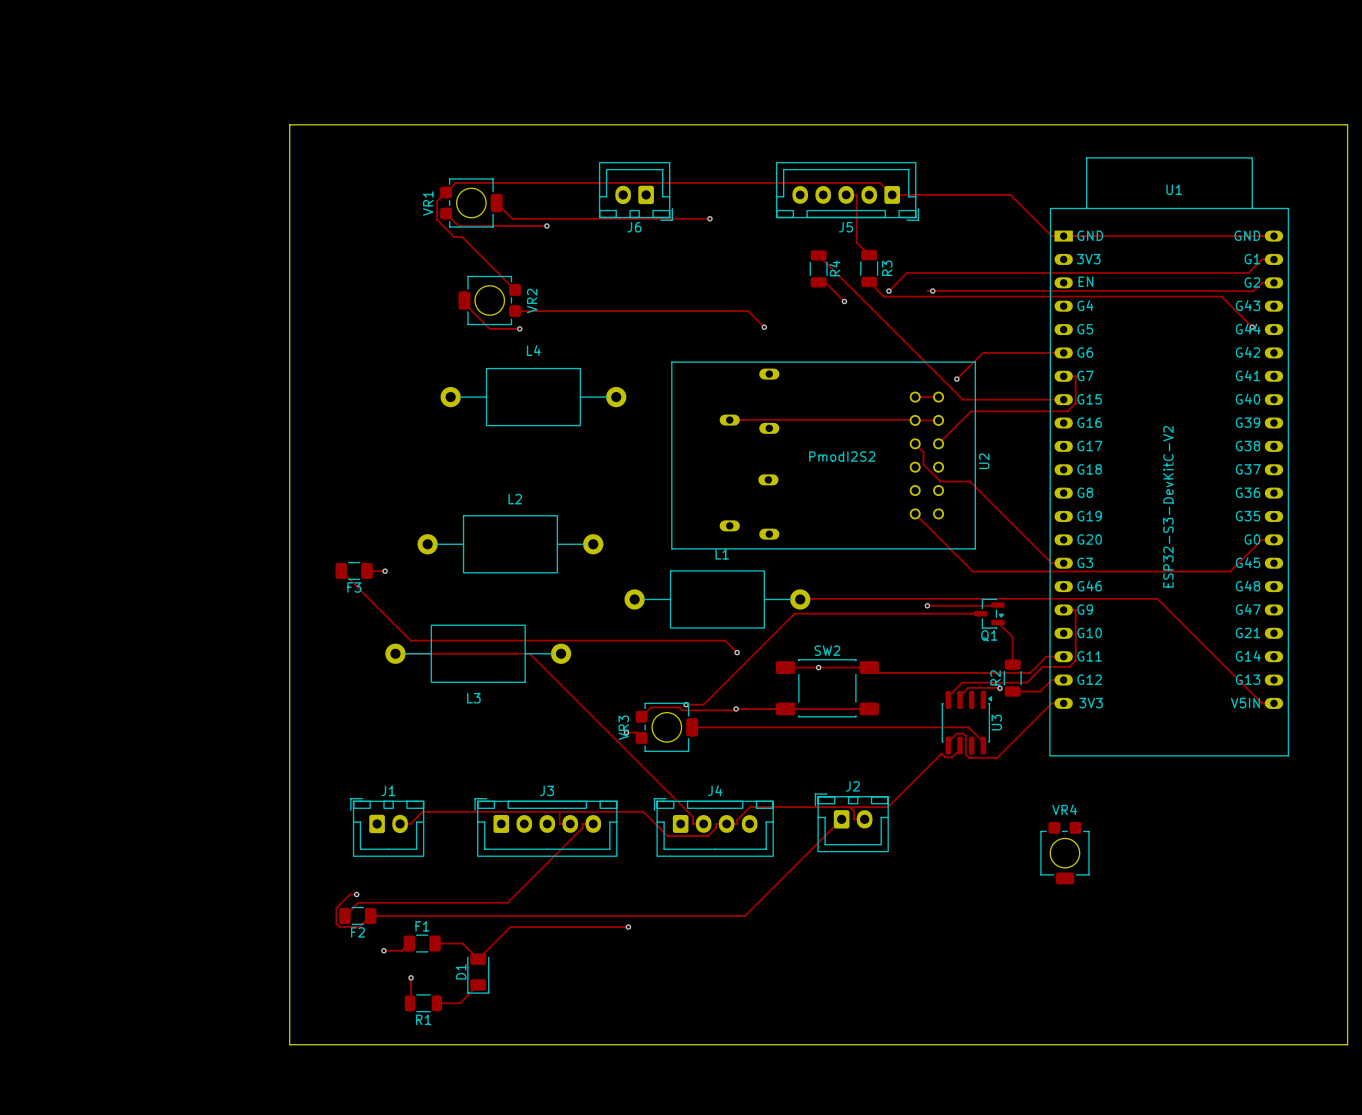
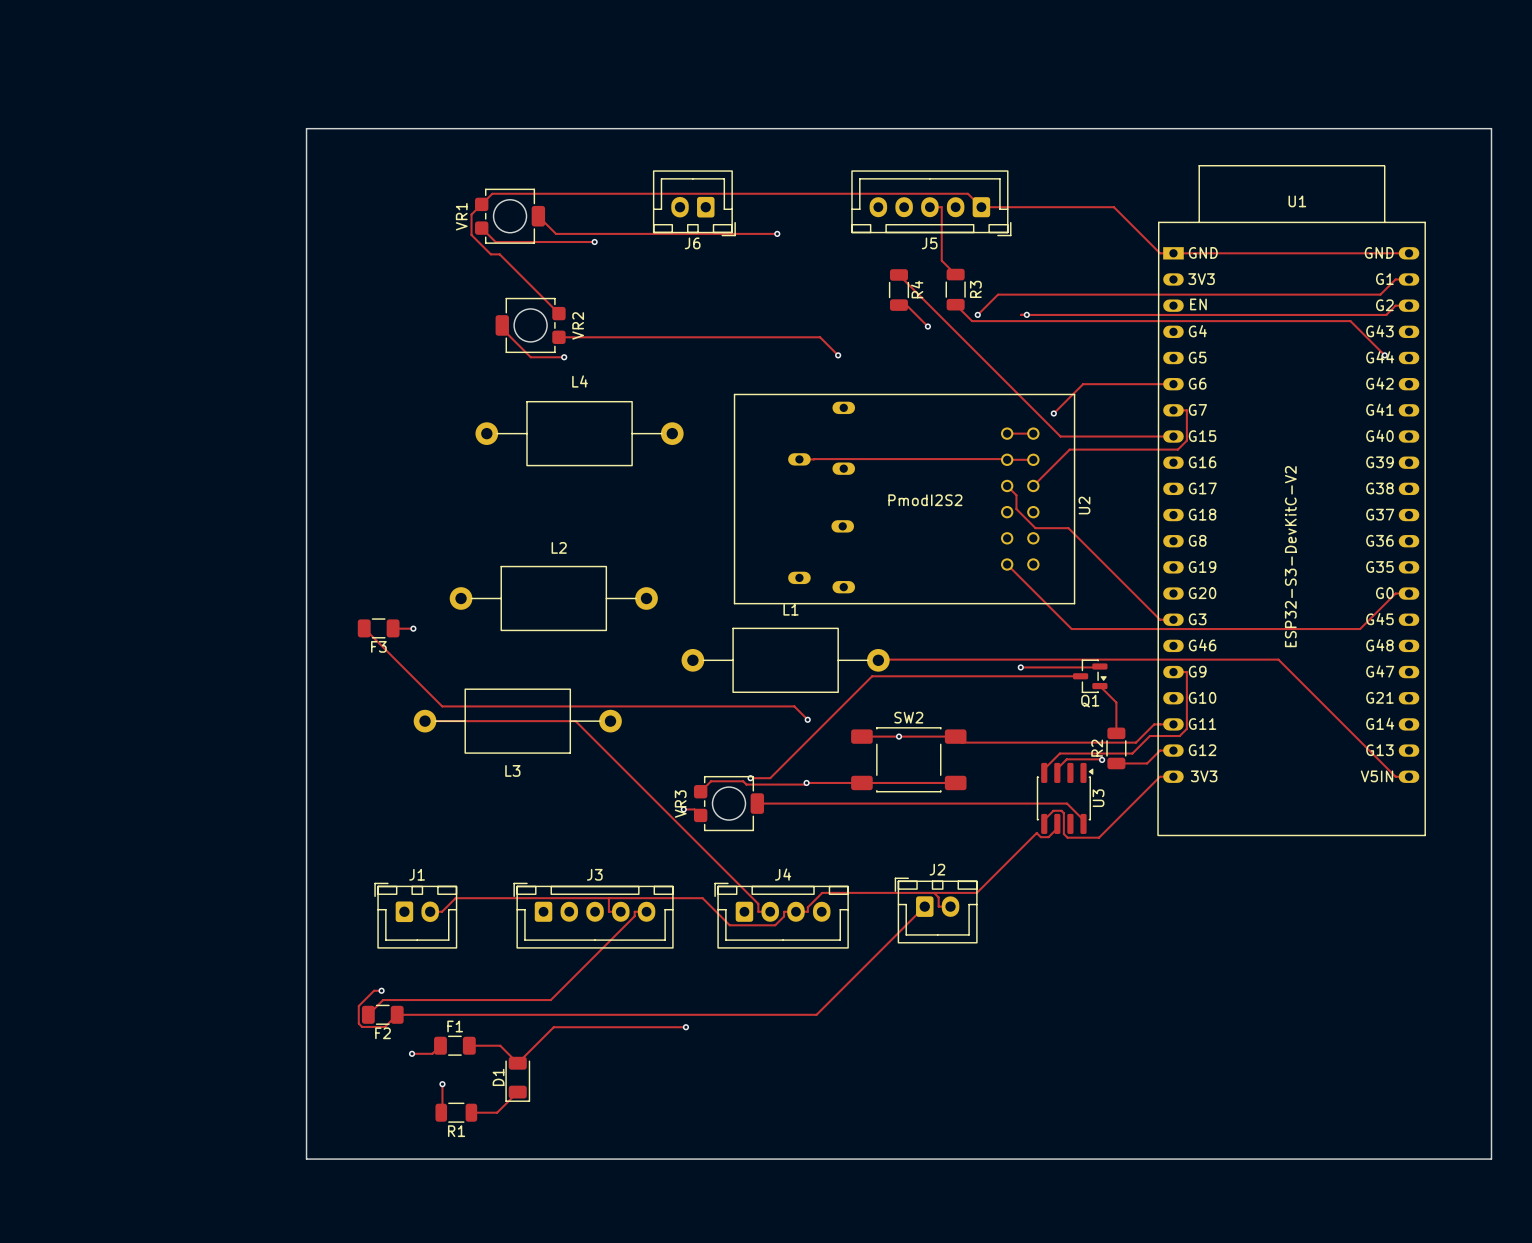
VR4: (1064, 853) -> none

